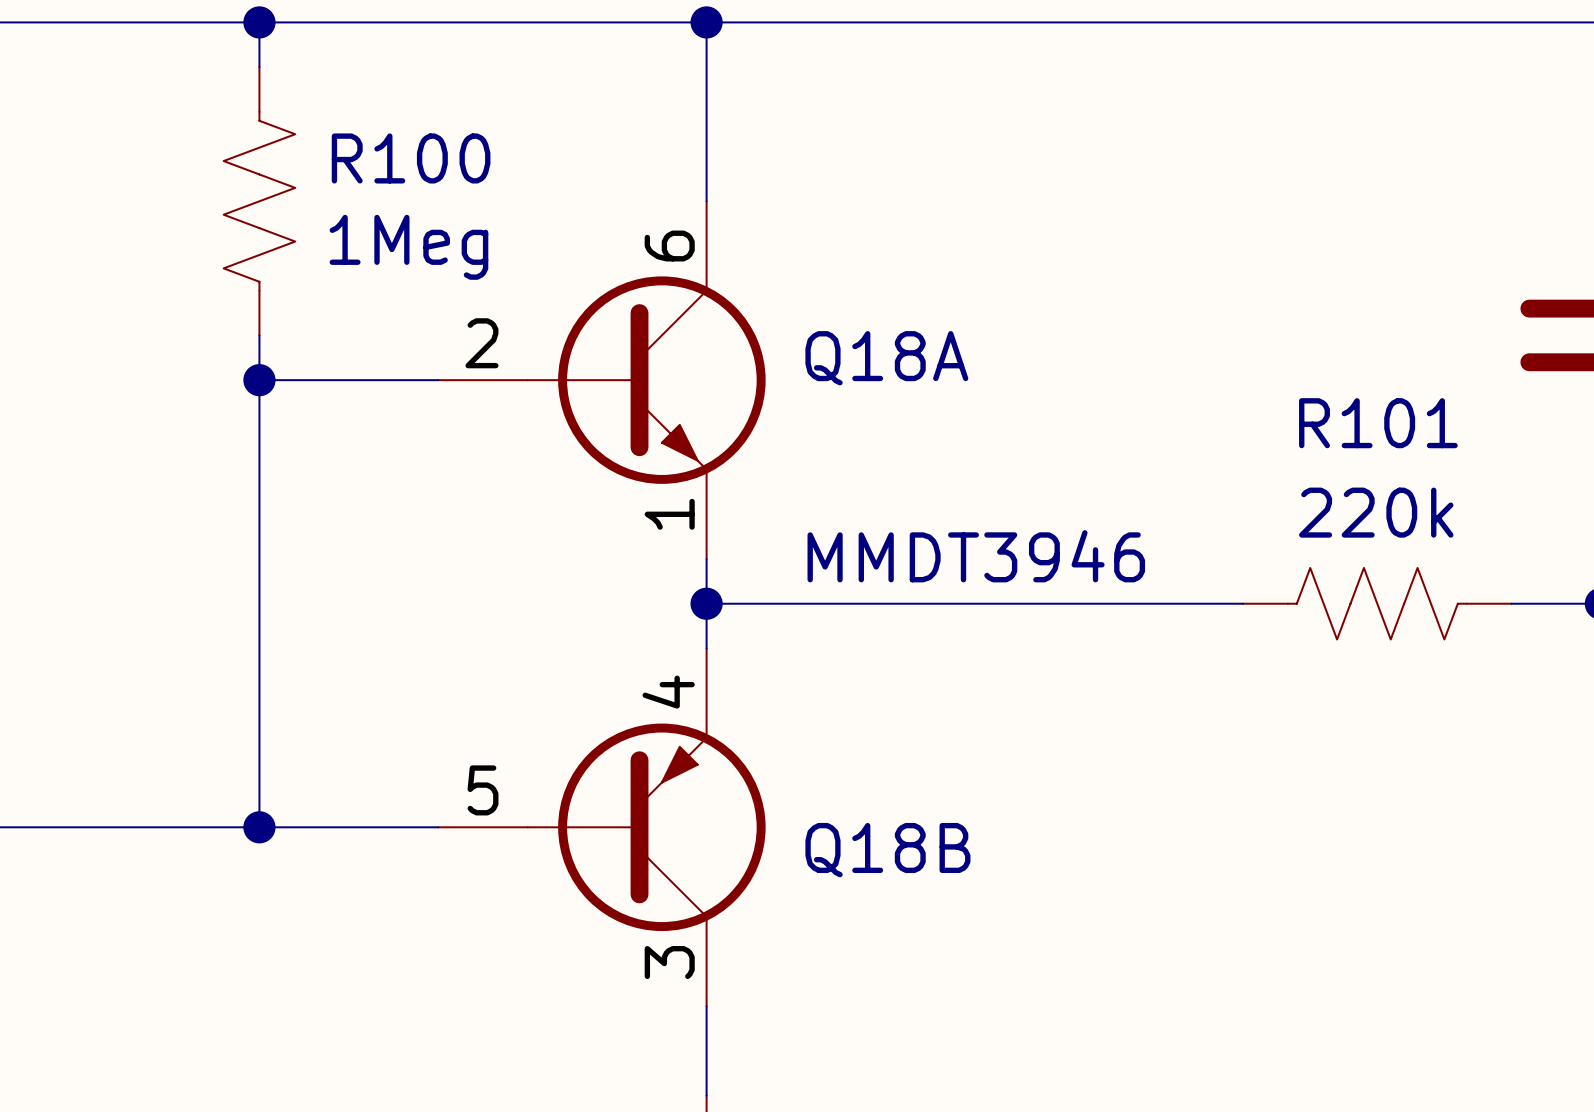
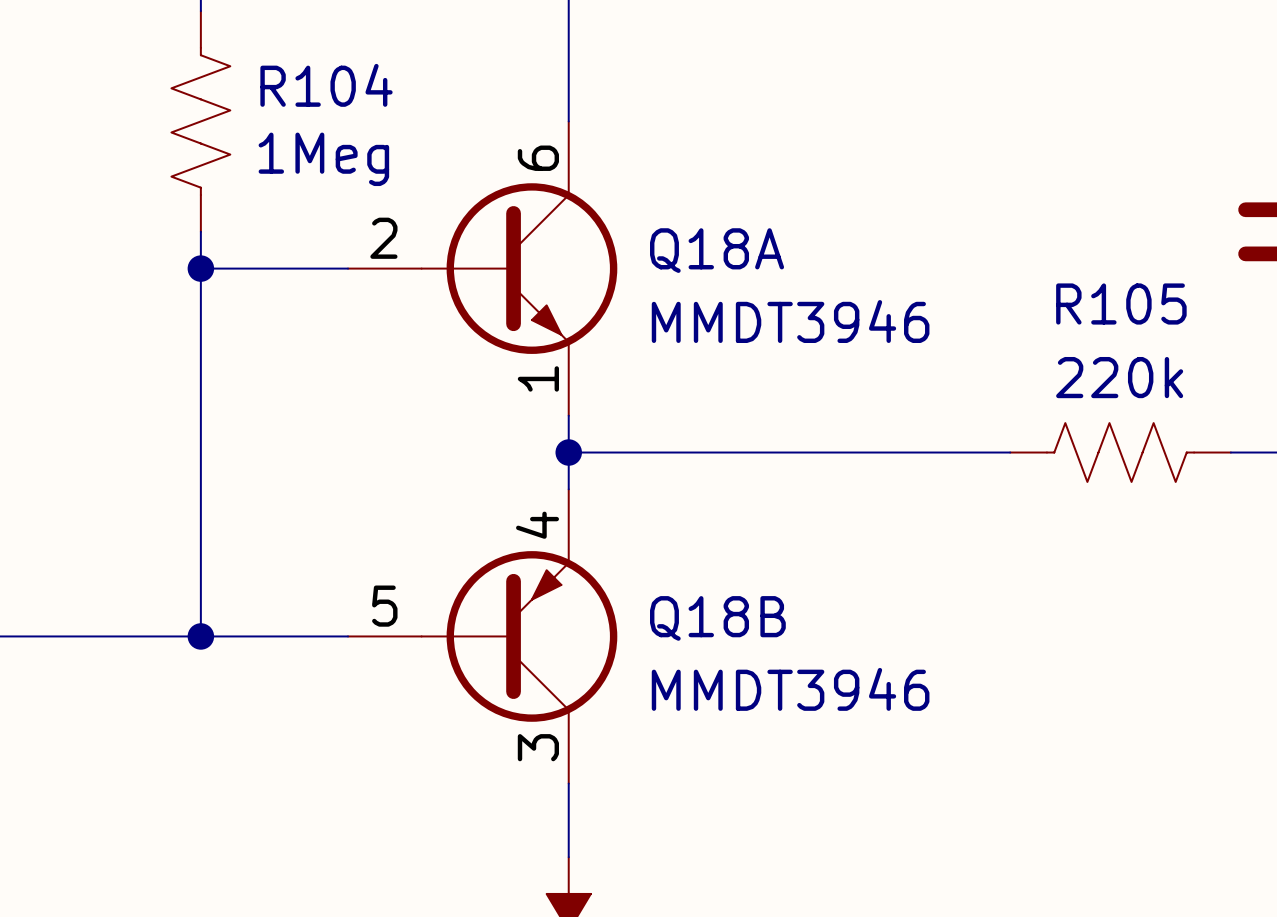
R100 name: R100 (411, 158) -> R104 (326, 85)
R101 name: R101 (1378, 423) -> R105 (1121, 304)
Q18A value position: MMDT3946 (976, 556) -> MMDT3946 (790, 321)
Q18B name position: Q18B (887, 850) -> Q18B (717, 618)
Q18B value: none -> MMDT3946 (790, 689)

